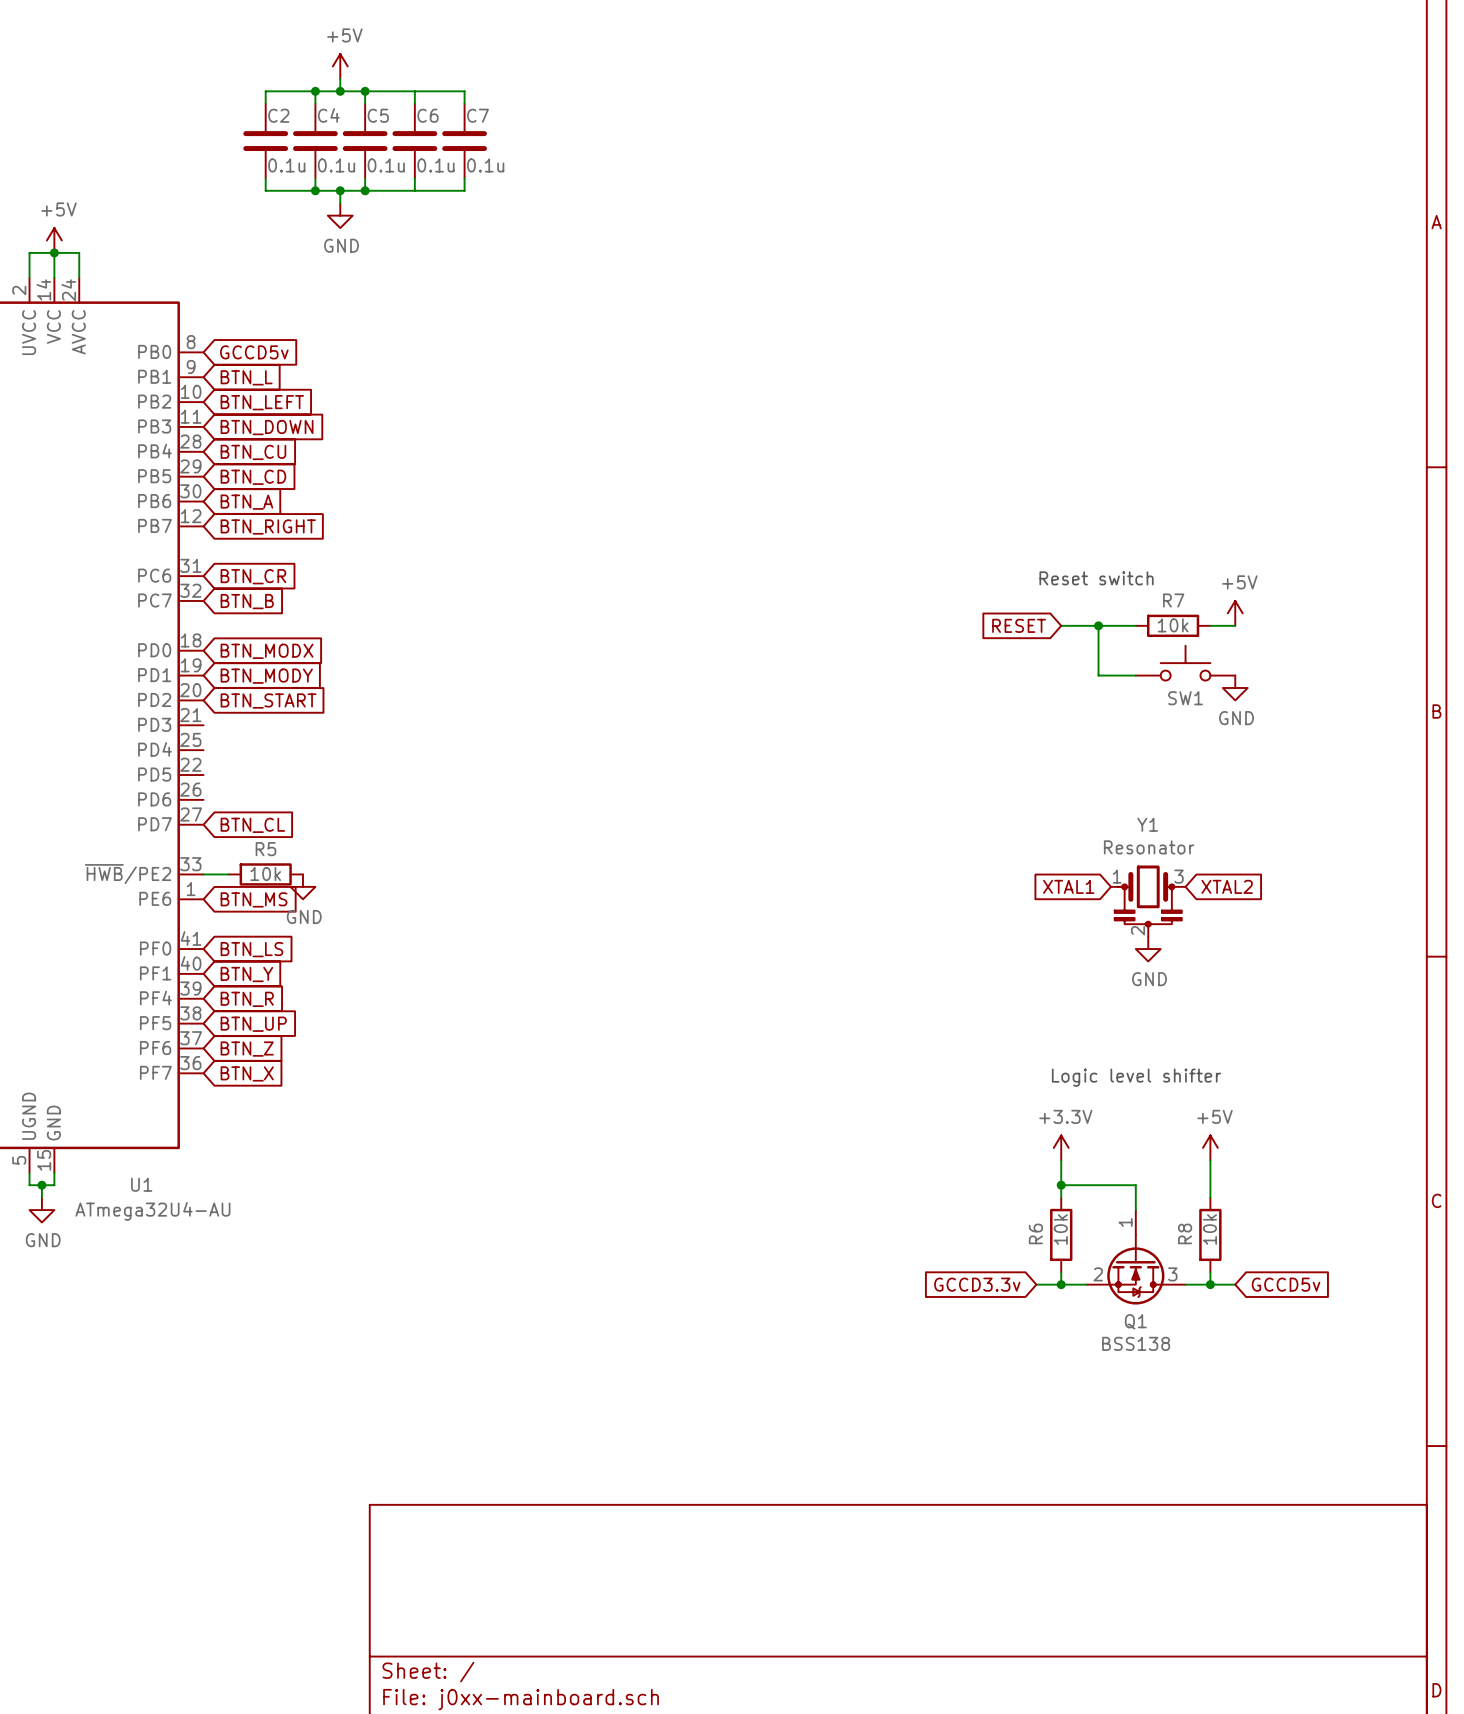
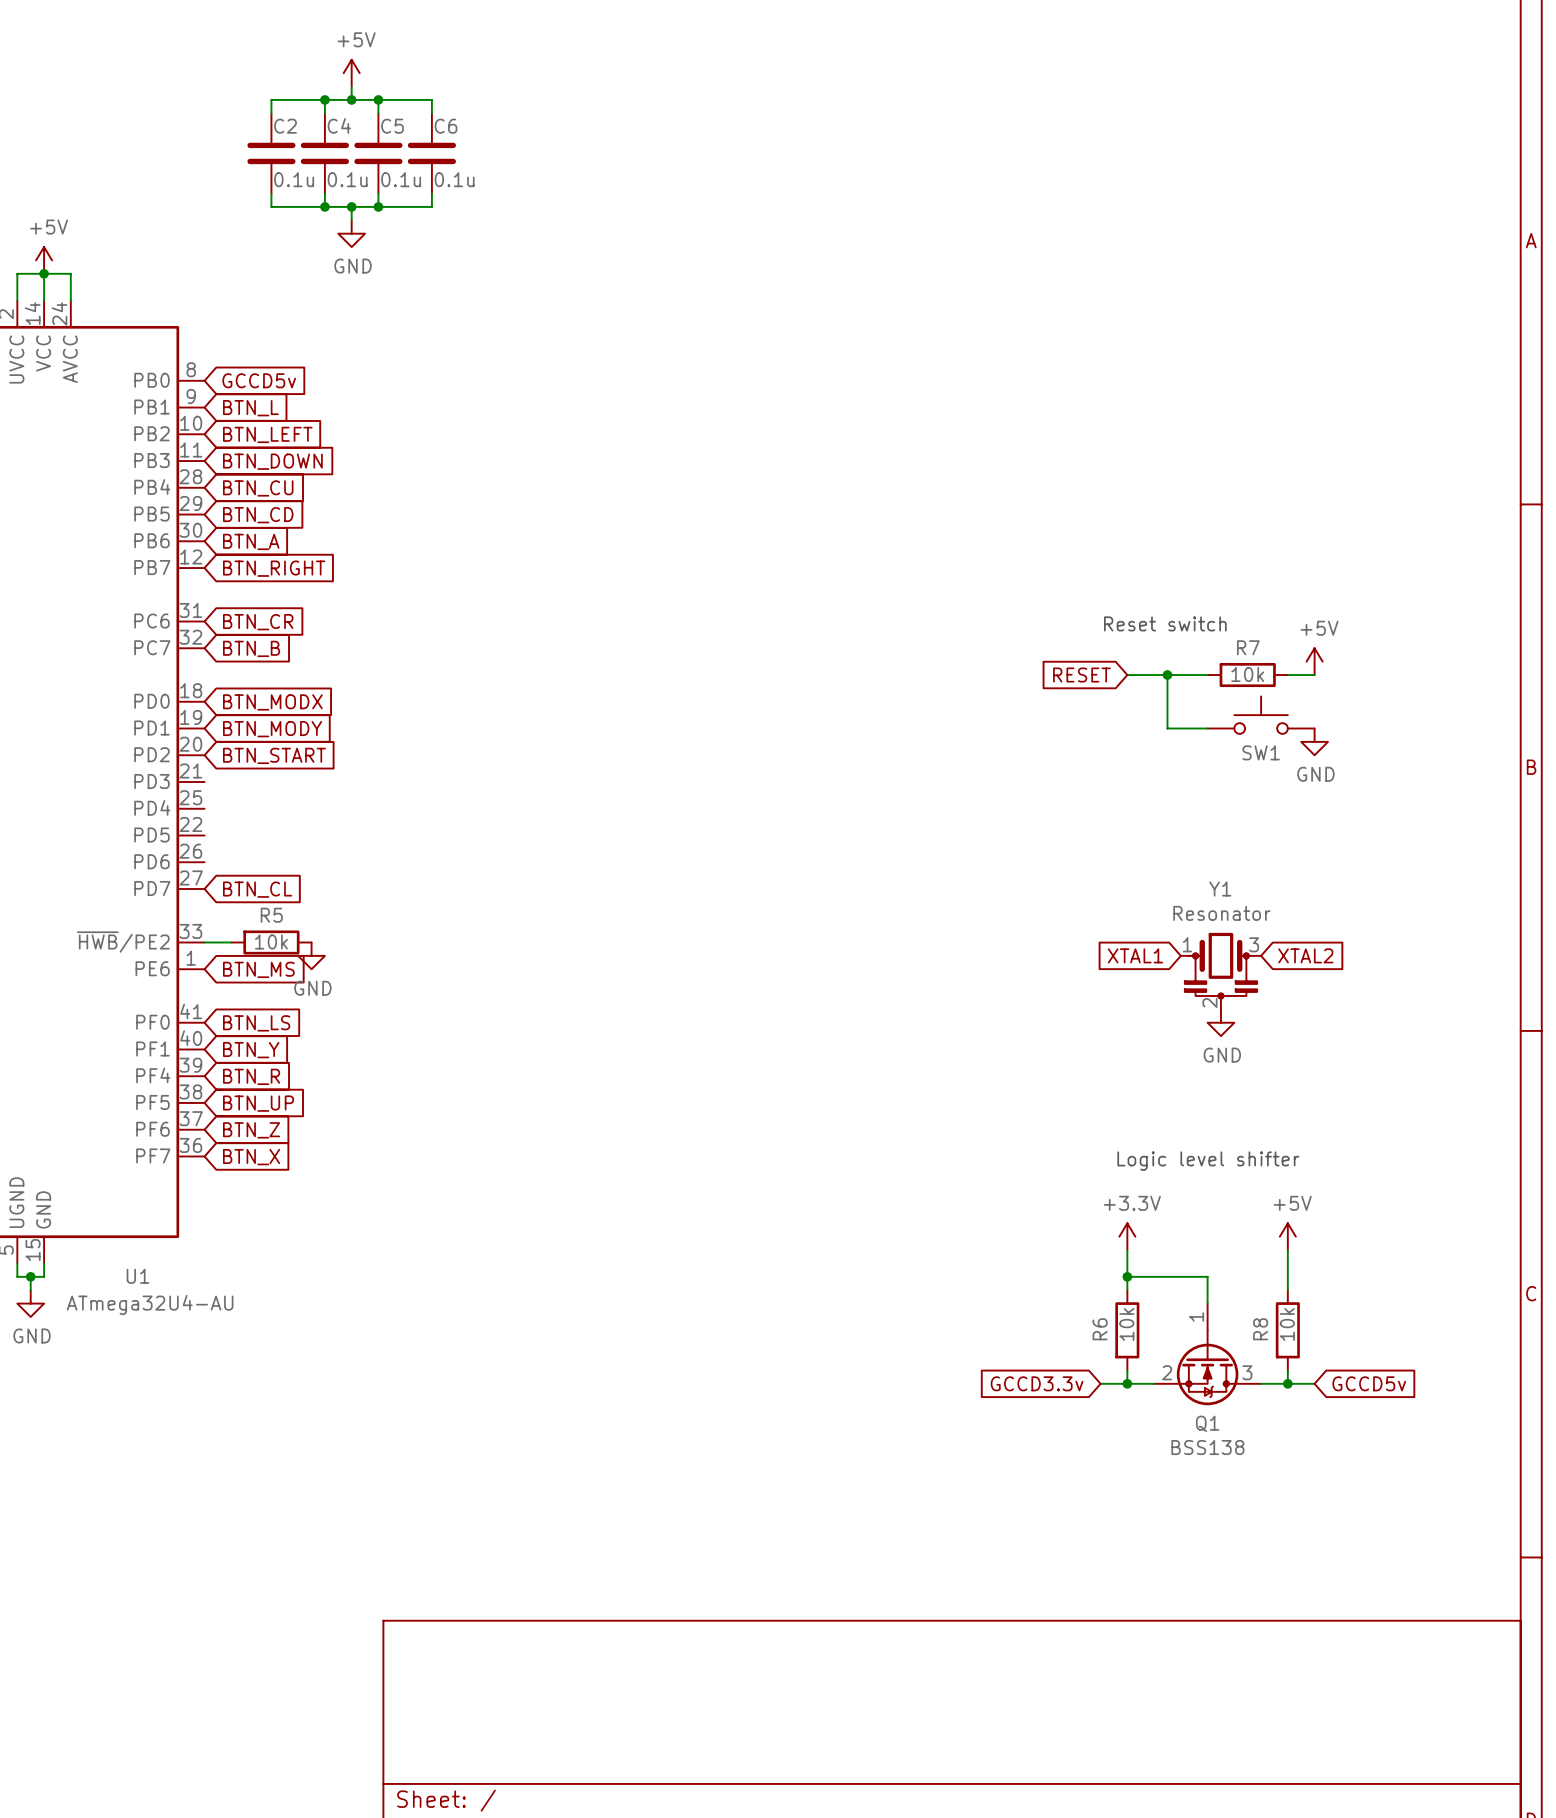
wire: (414, 91) (464, 91) (464, 103) -> none
C7: 0.1u (464, 141) -> none
wire: (464, 178) (464, 190) (414, 190) -> none

